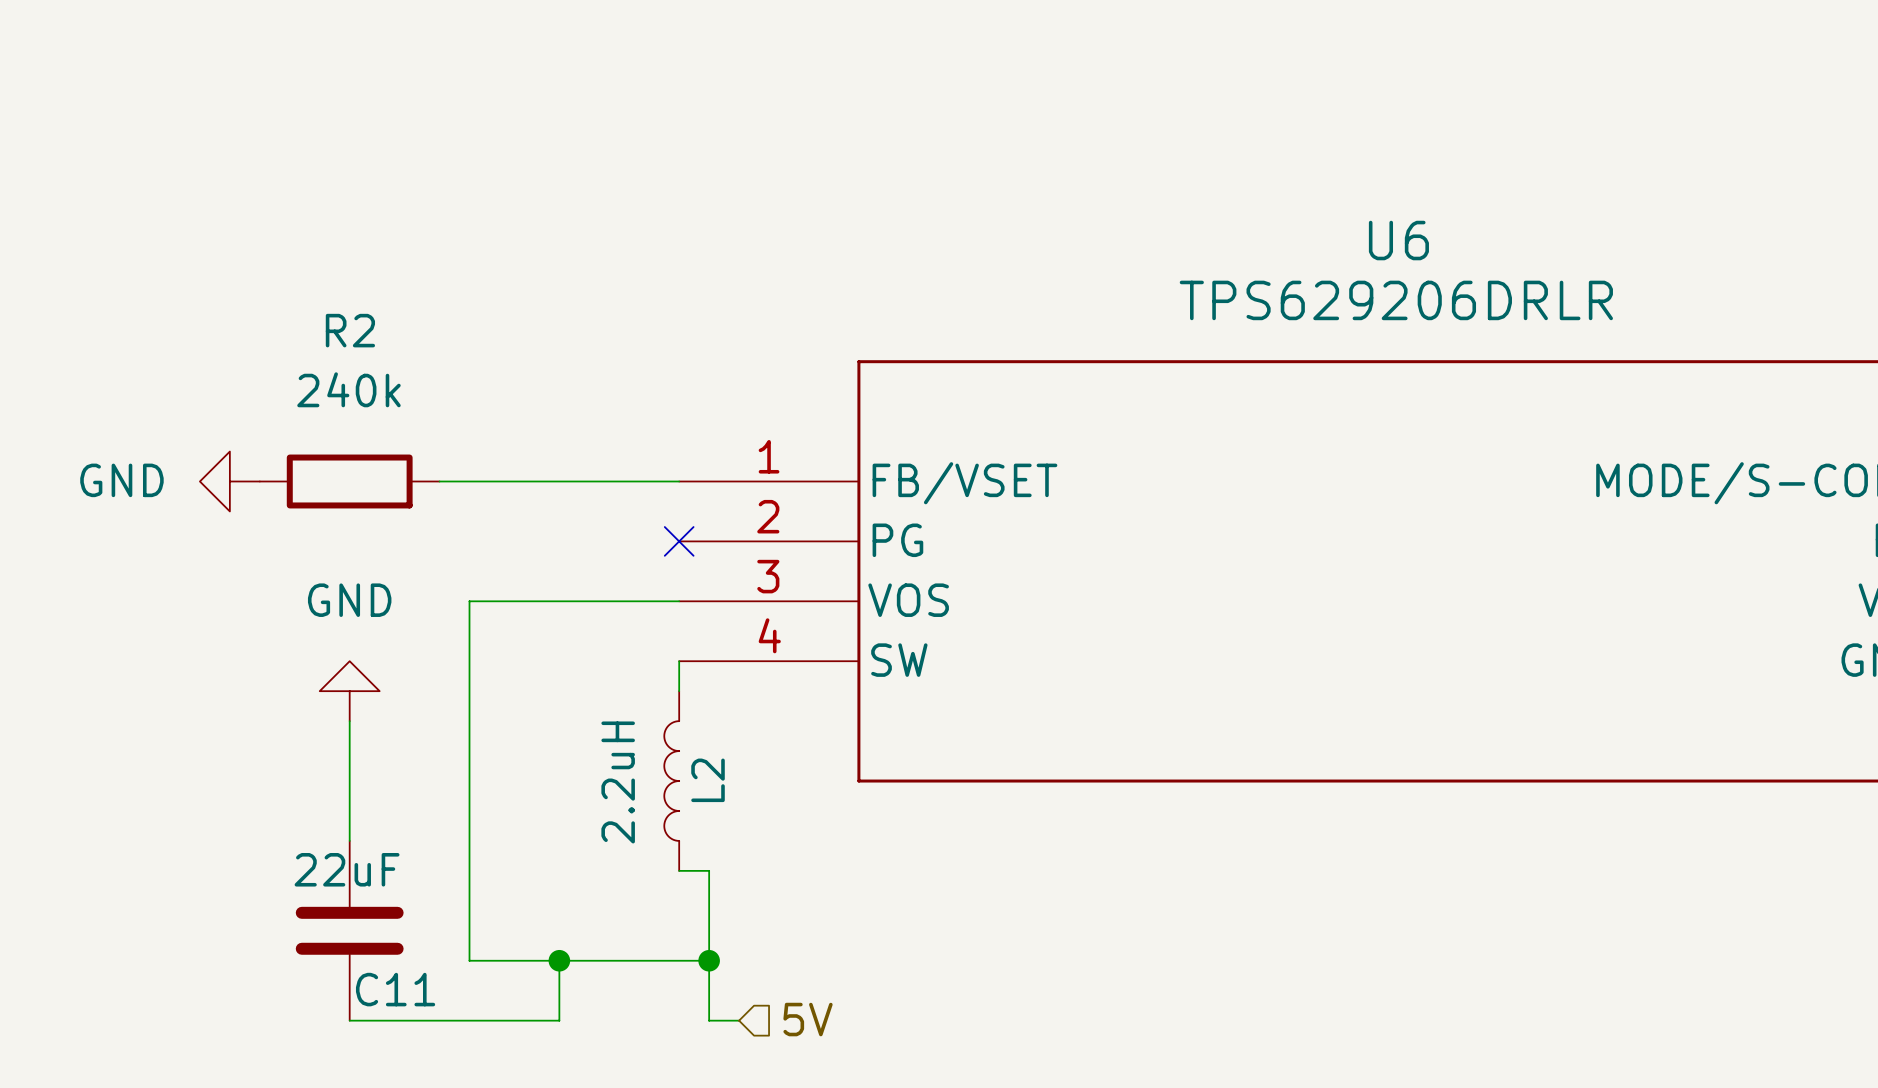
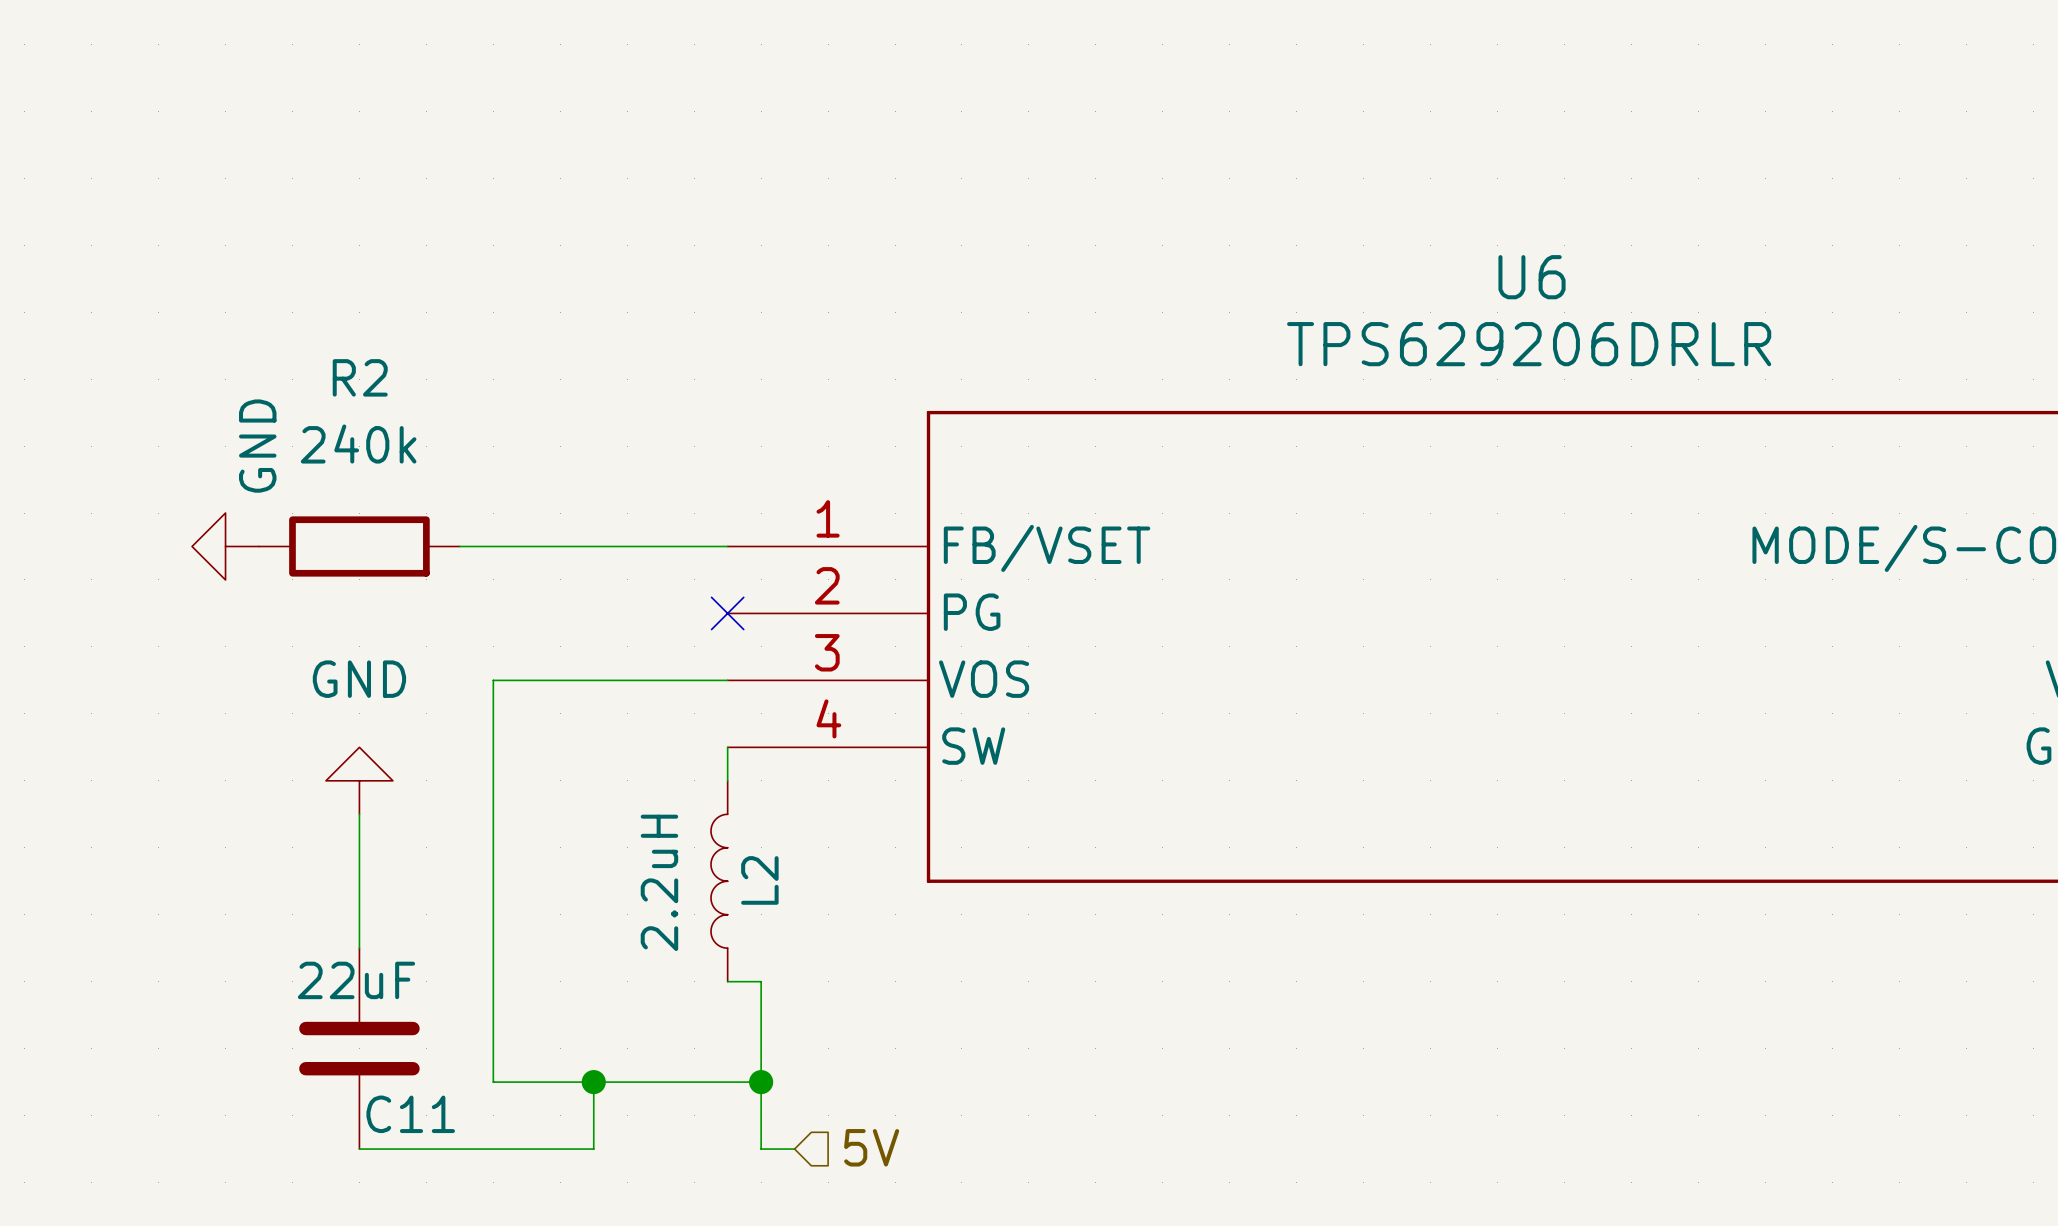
power symbol text rotation: 0° (121, 480) -> 90° counterclockwise (257, 446)
power symbol text position: GND (121, 480) -> GND (257, 446)

